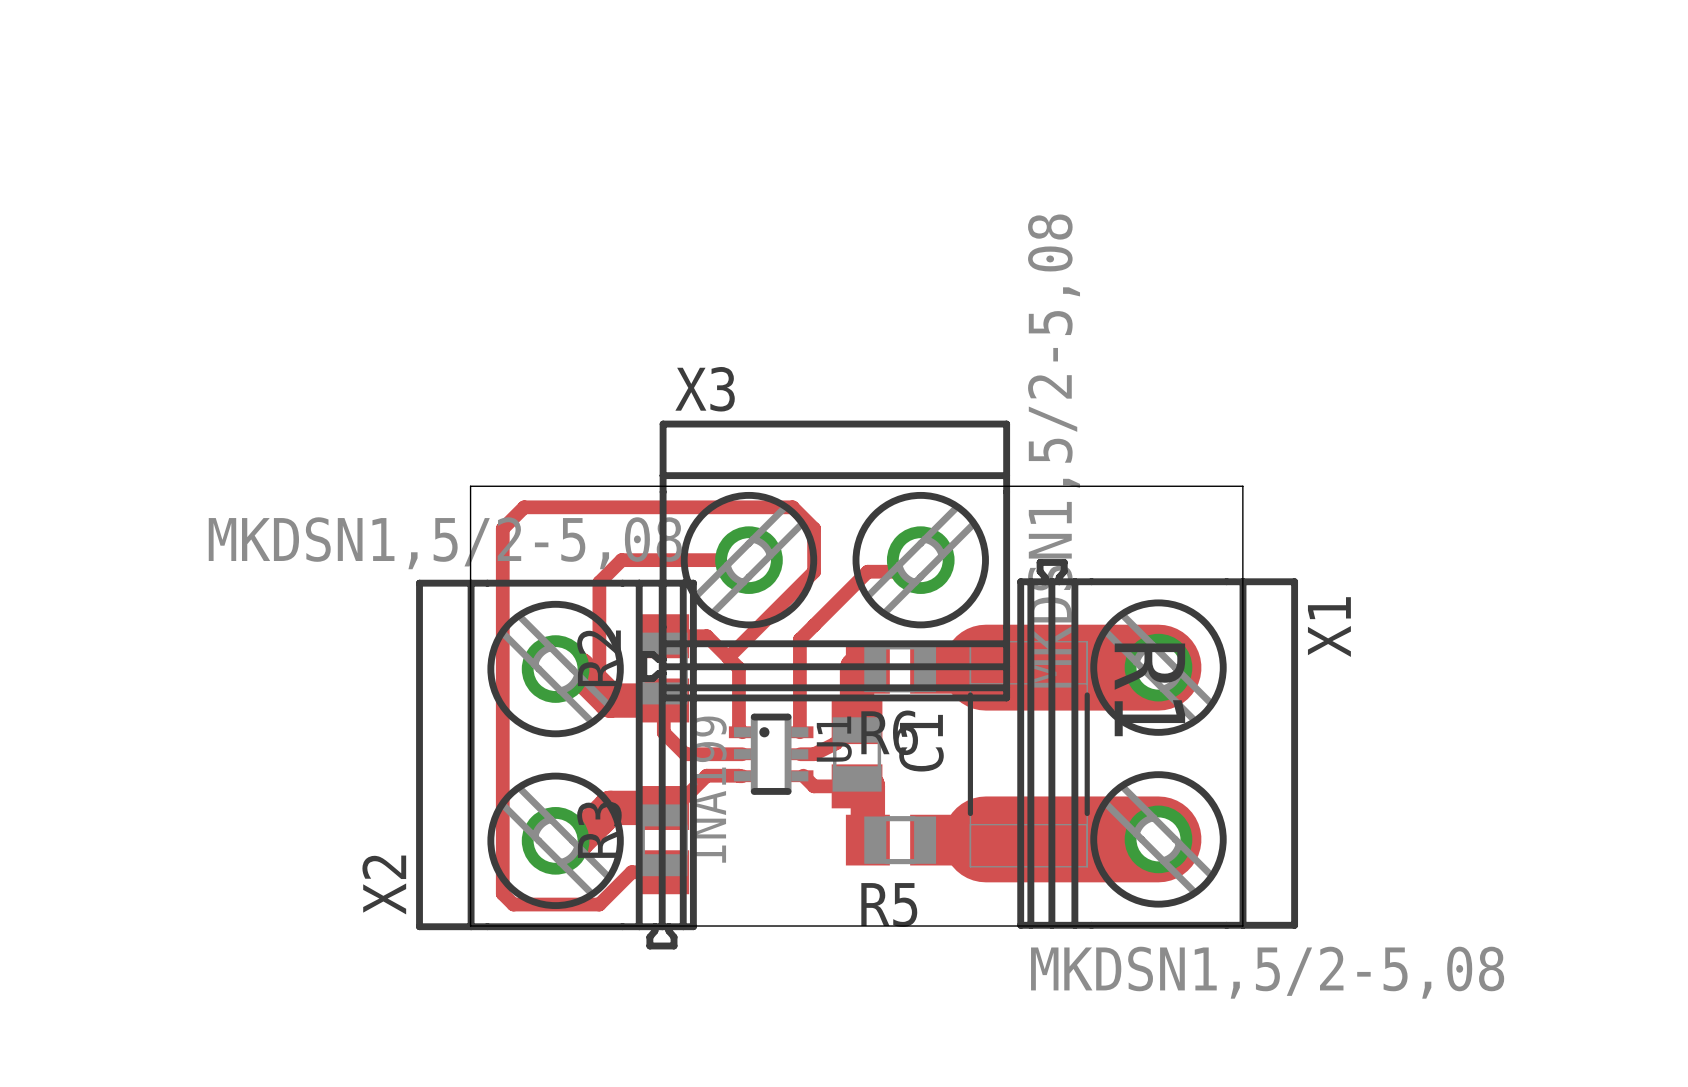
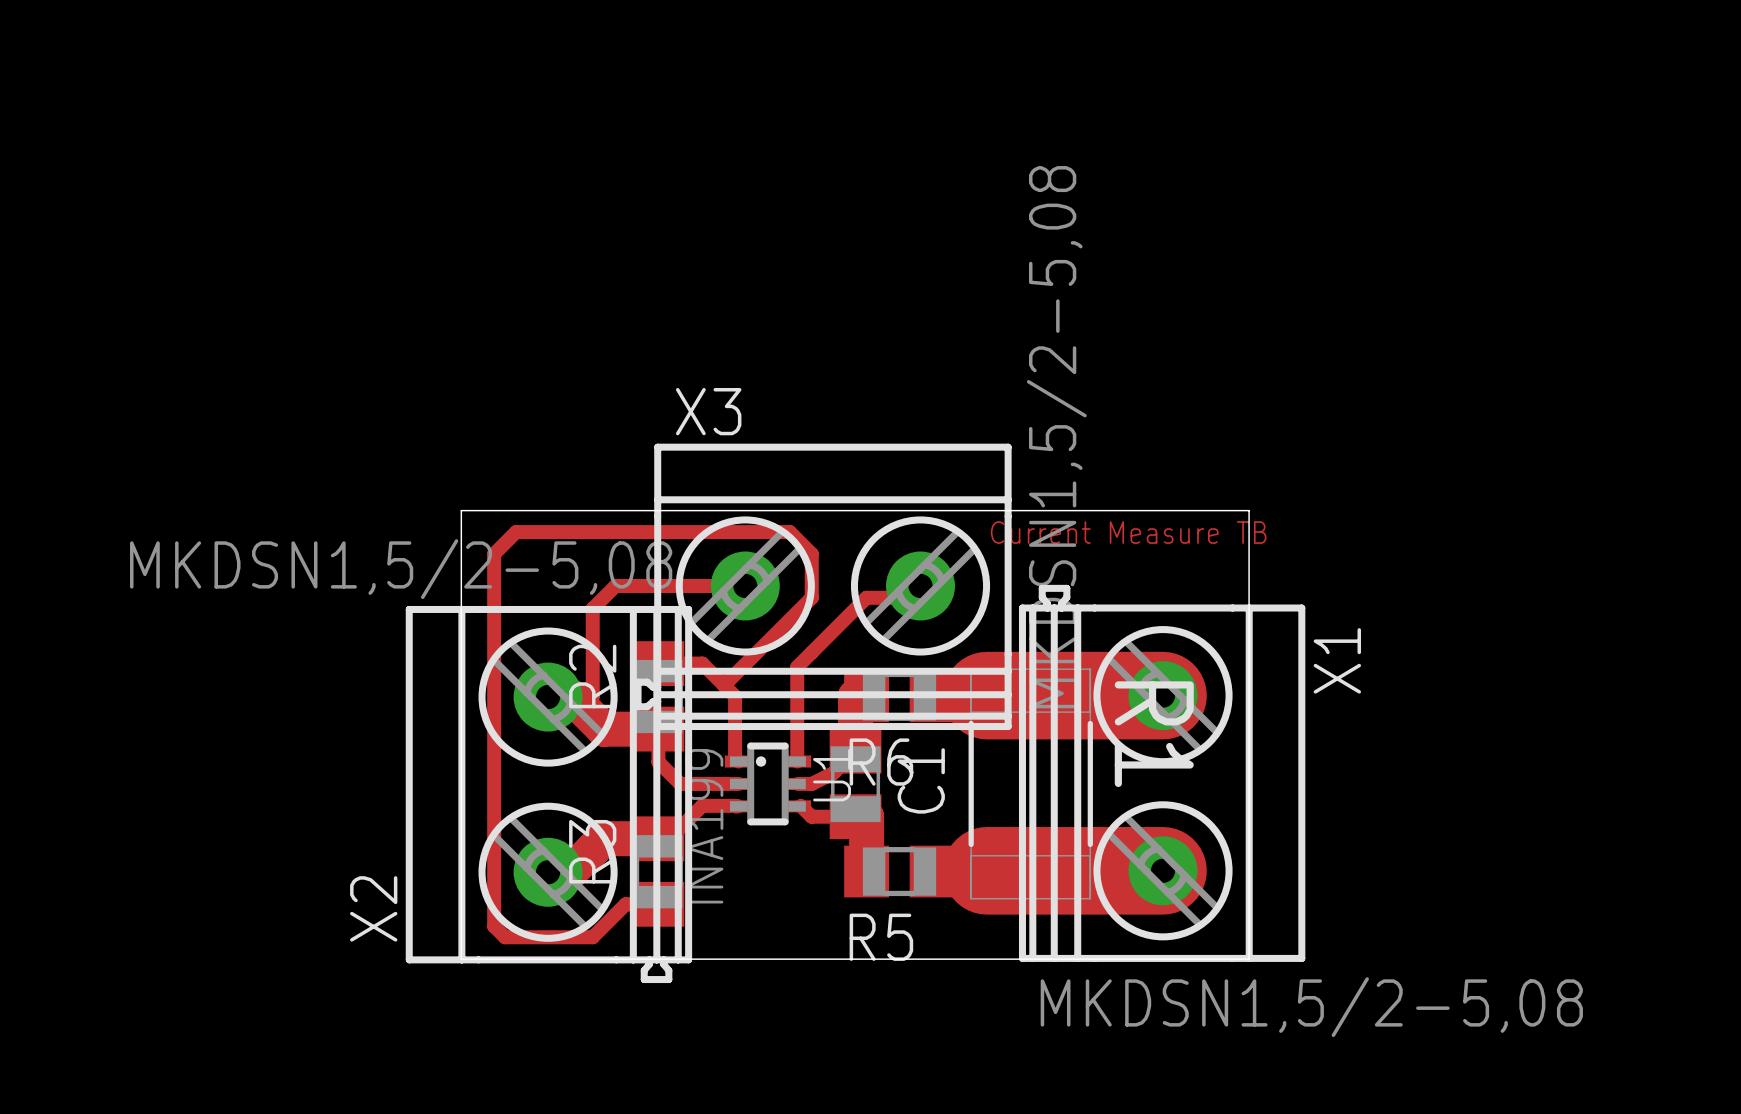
X3 footprint: [640, 420, 1011, 702] -> [634, 443, 1012, 731]
text: none -> Current Measure TB (1128, 532)
X1 footprint: [1017, 559, 1299, 929] -> [1018, 584, 1306, 962]
X2 footprint: [416, 579, 697, 950] -> [405, 605, 693, 984]

